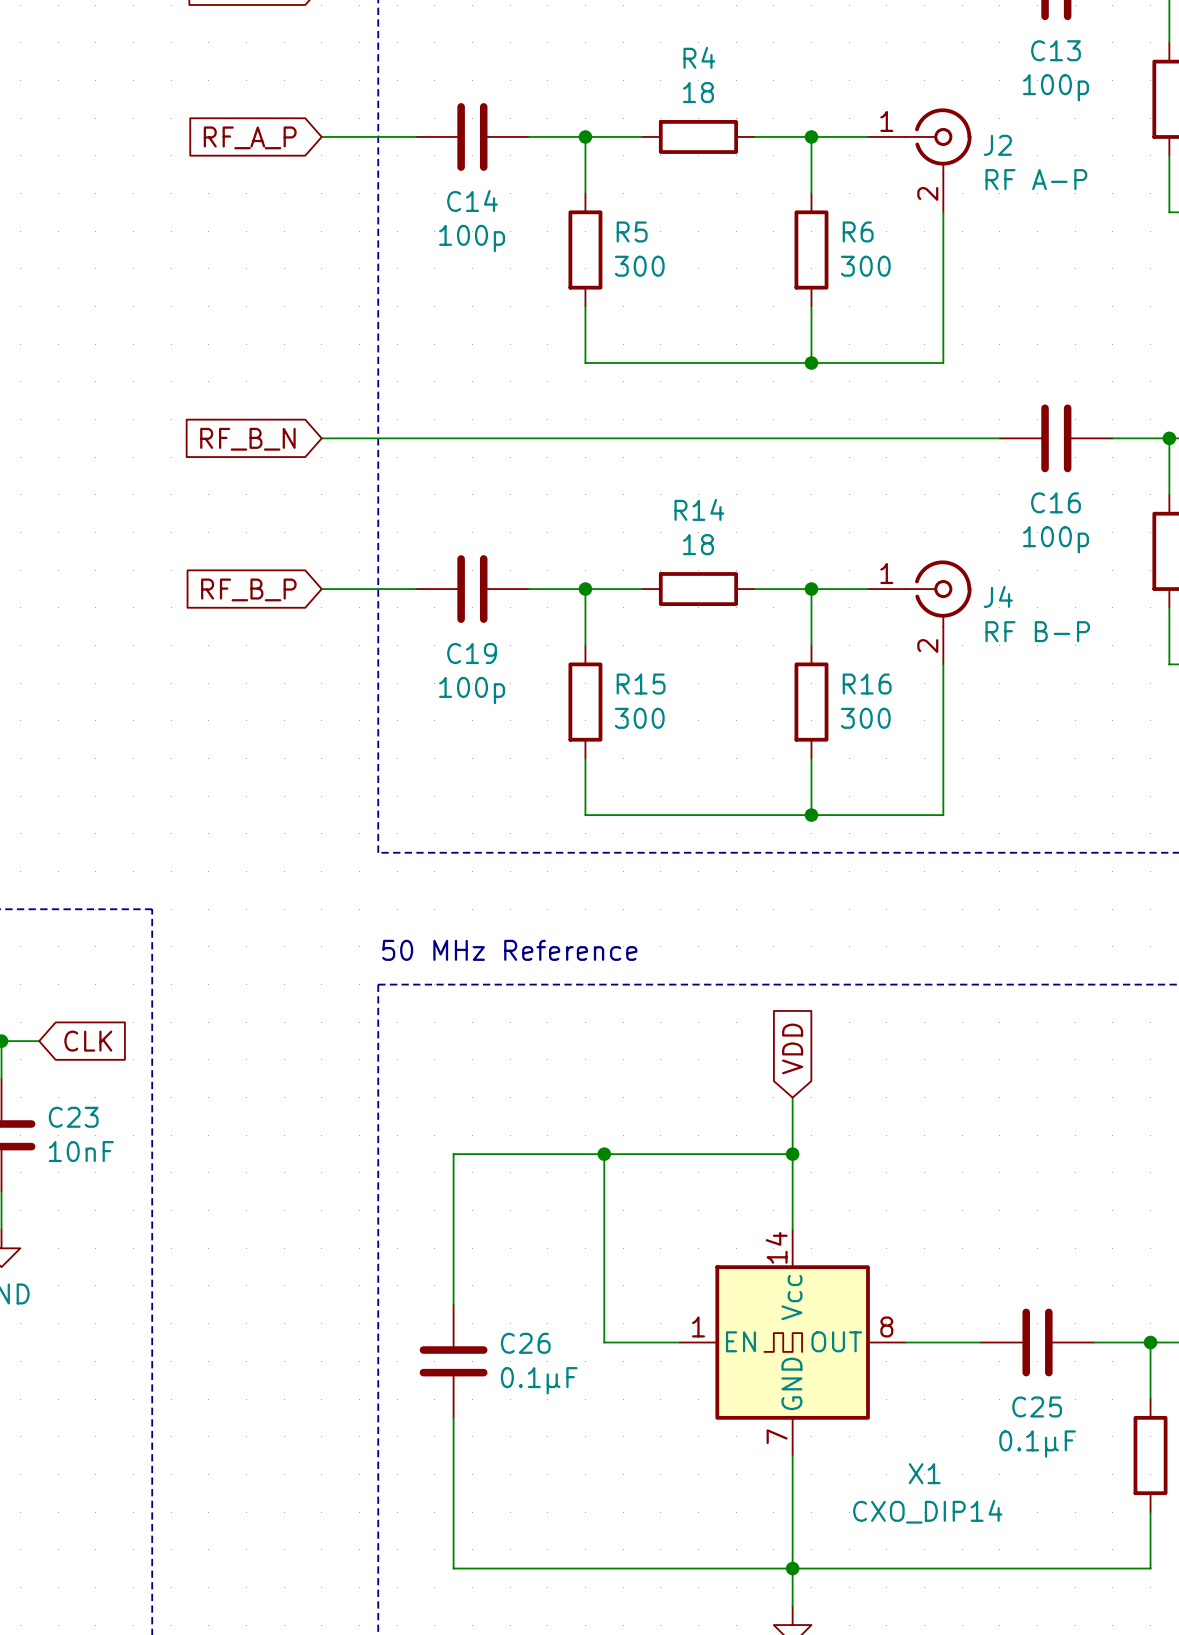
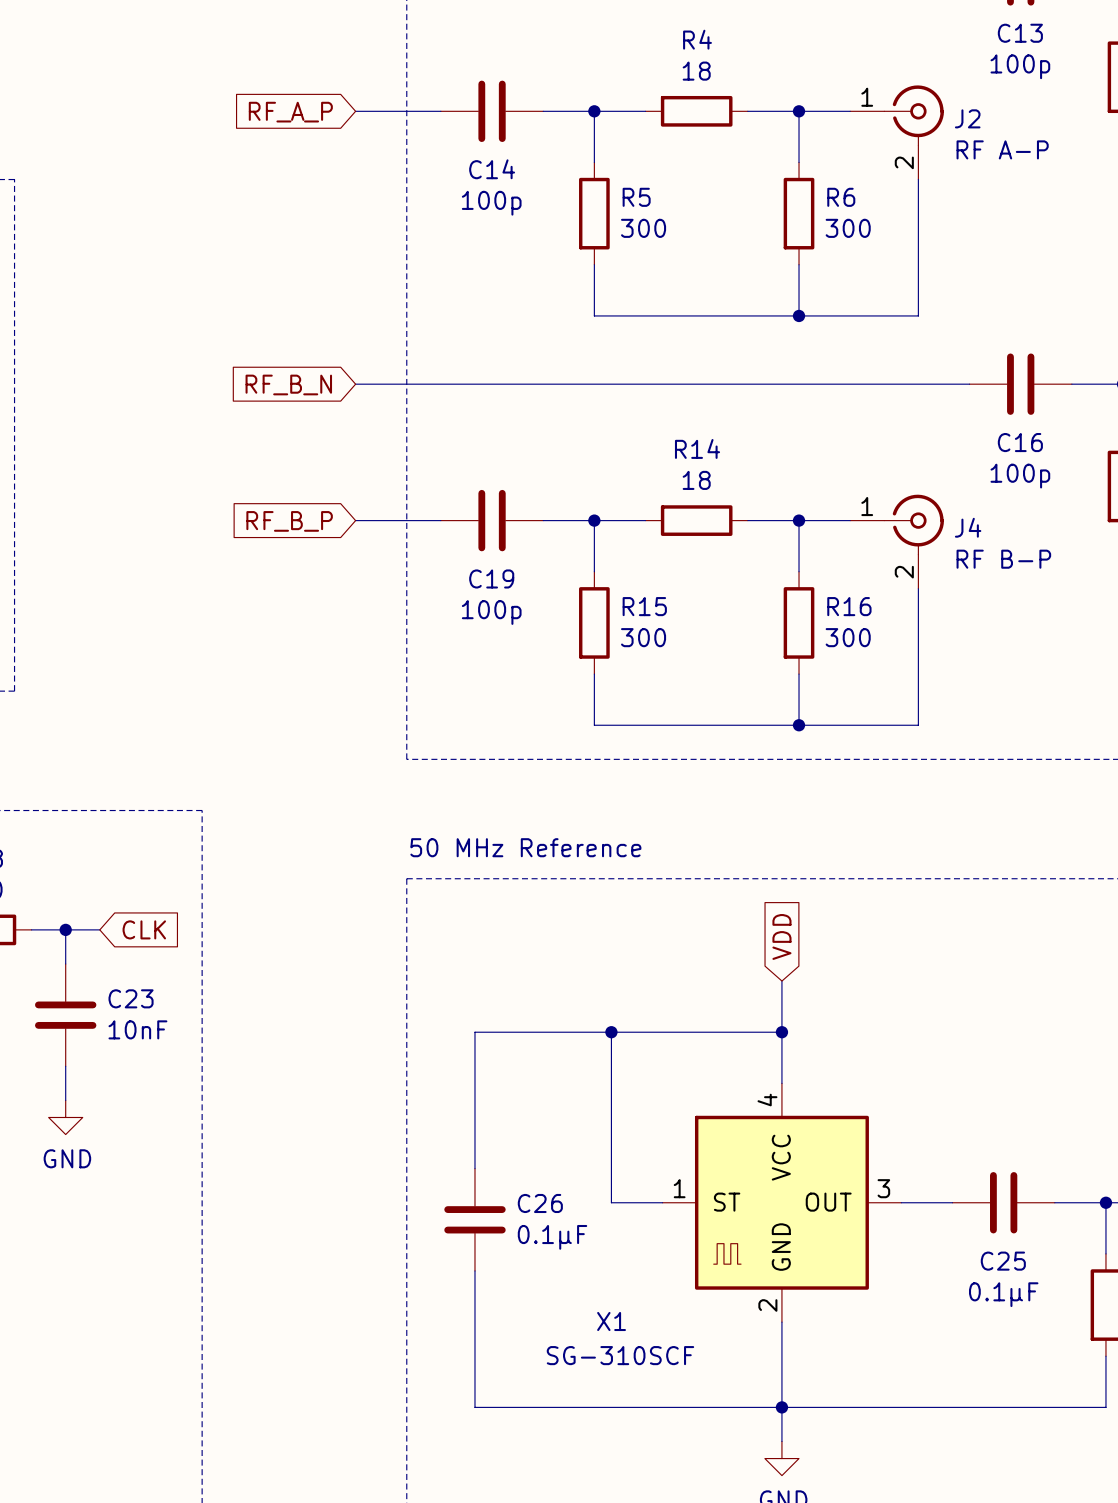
X1 symbol: [679, 1229, 906, 1456] -> [662, 1083, 902, 1323]
X1 name position: X1 (924, 1473) -> X1 (611, 1321)
X1 value: CXO_DIP14 (927, 1511) -> SG-310SCF (620, 1355)

